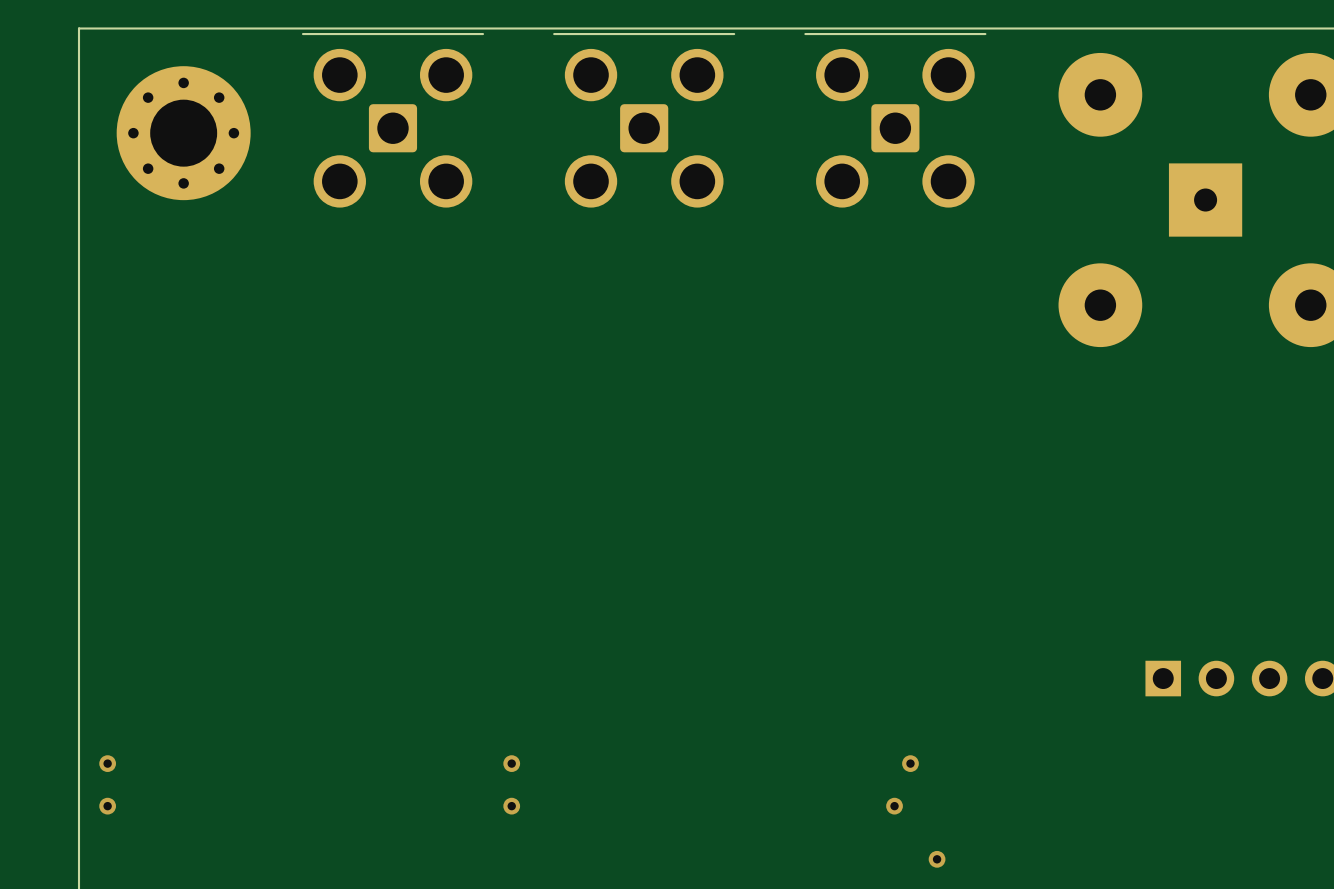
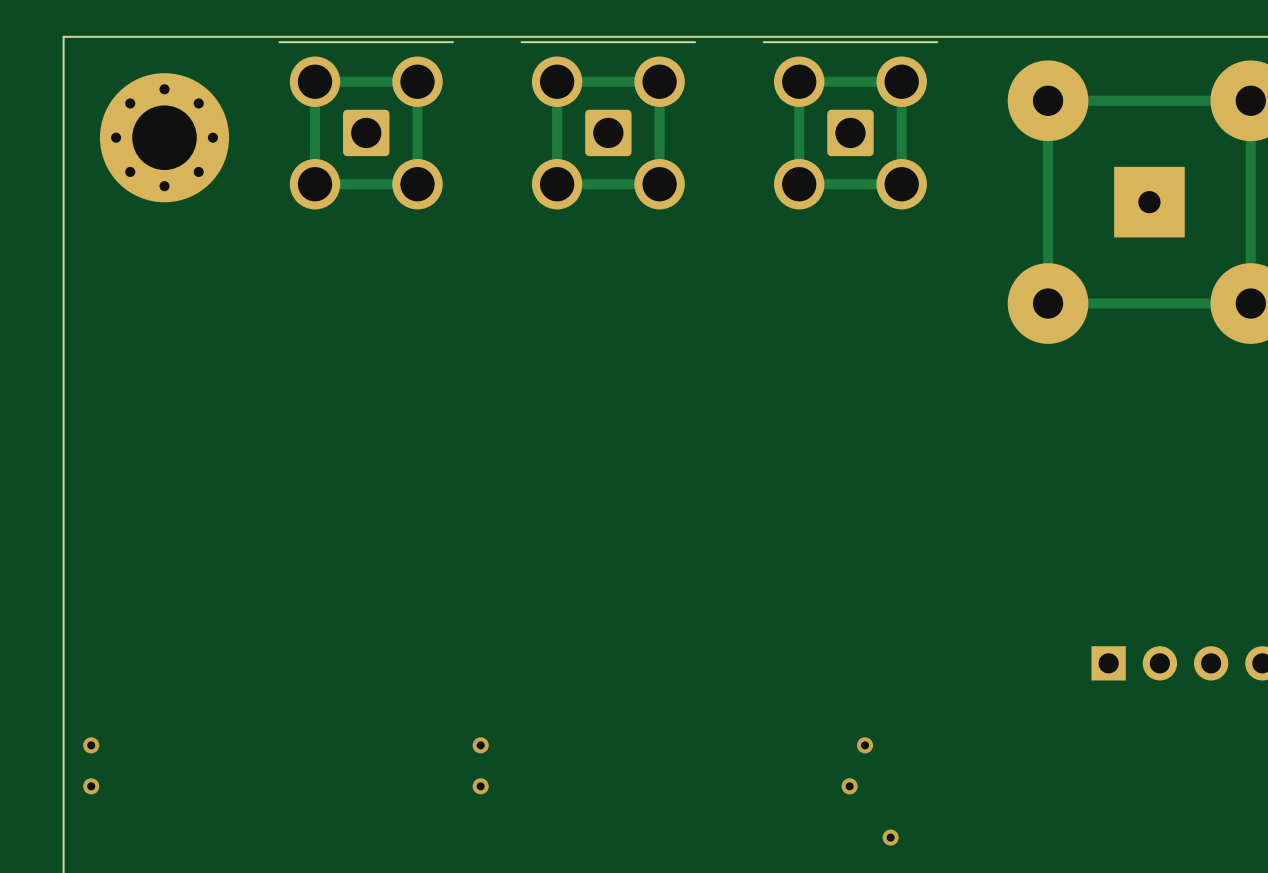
track: none -> (417, 81) (315, 81) (315, 184) (417, 184) (417, 81)
track: none -> (659, 81) (557, 81) (557, 184) (659, 184) (659, 81)
track: none -> (901, 81) (799, 81) (799, 184) (901, 184) (901, 81)
track: none -> (1250, 100) (1250, 303) (1048, 303) (1048, 100) (1250, 100)

